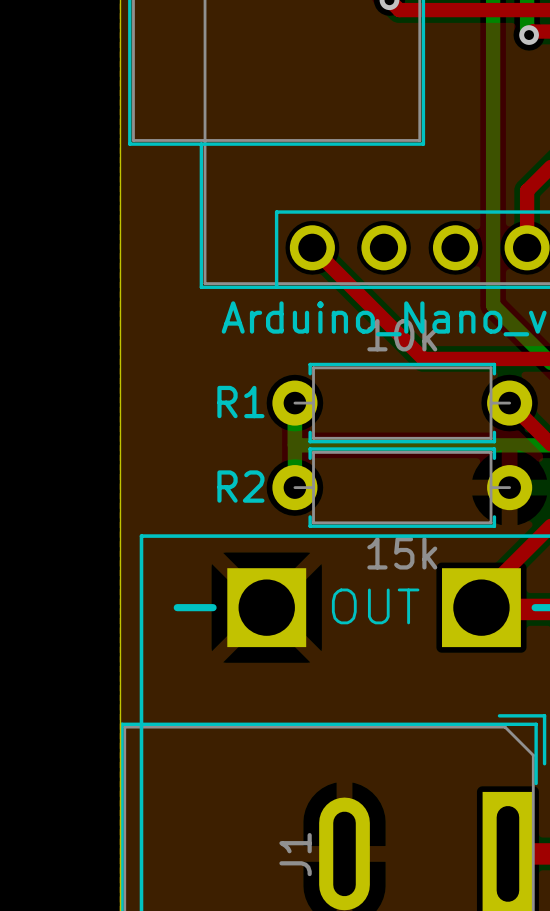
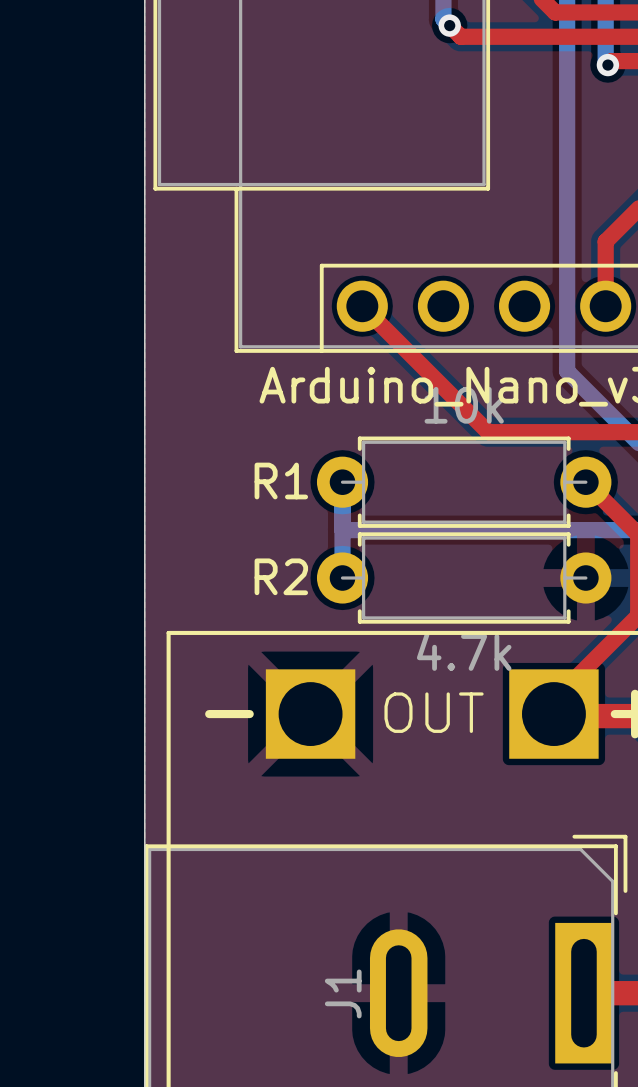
R2 value: 15k (402, 553) -> 4.7k (464, 651)

